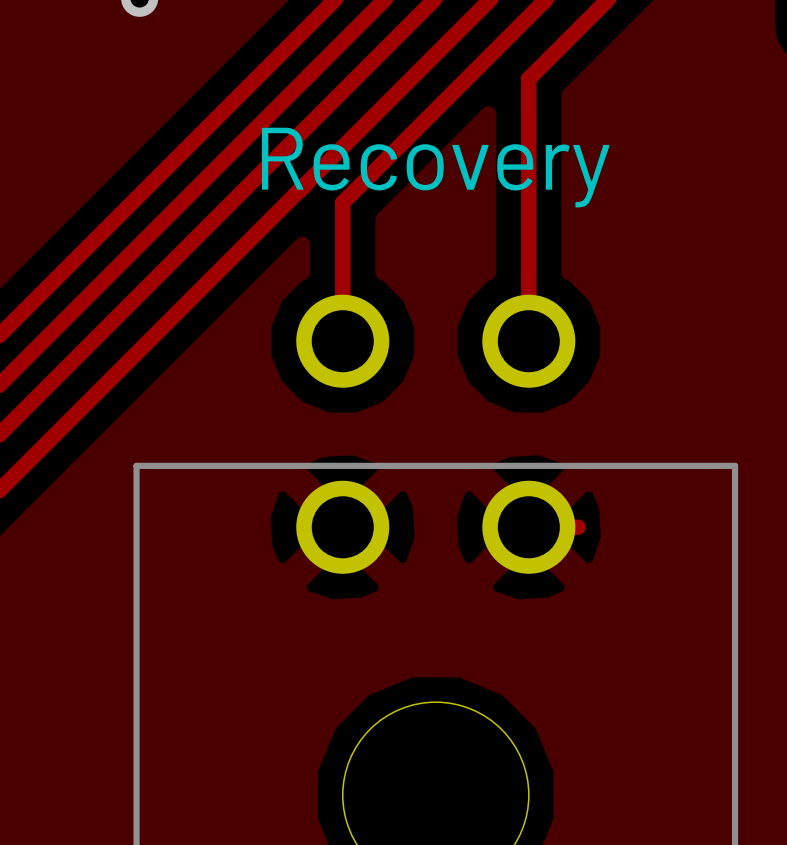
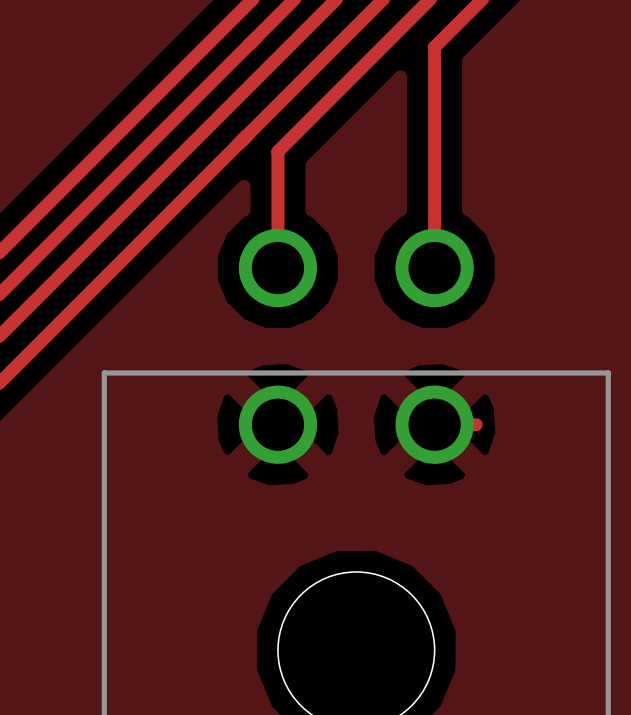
text: Recovery (435, 167) -> none

